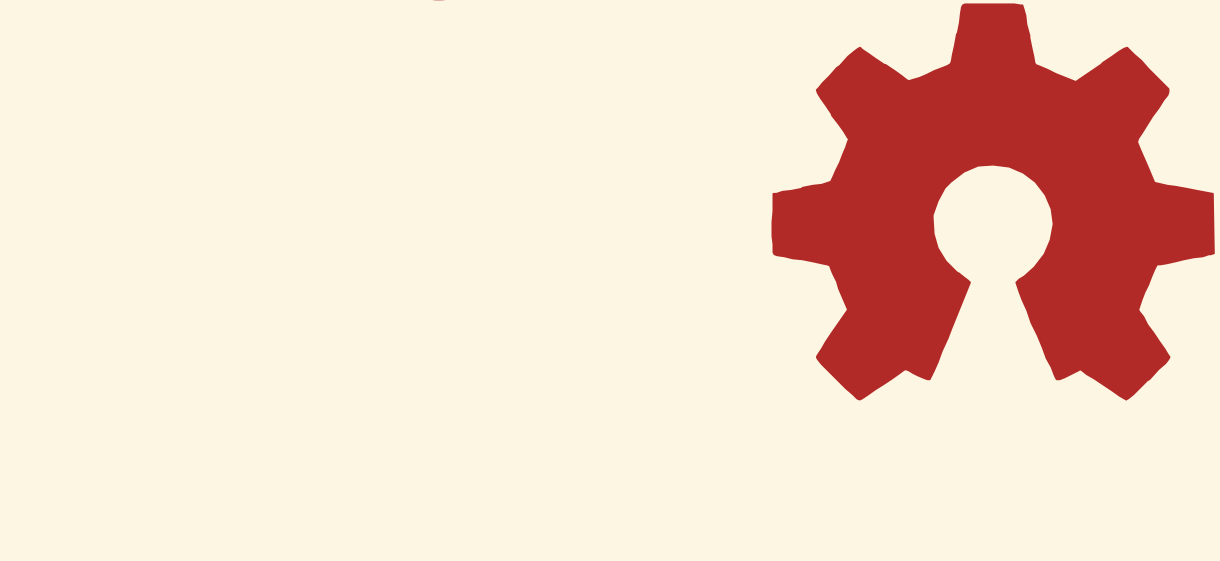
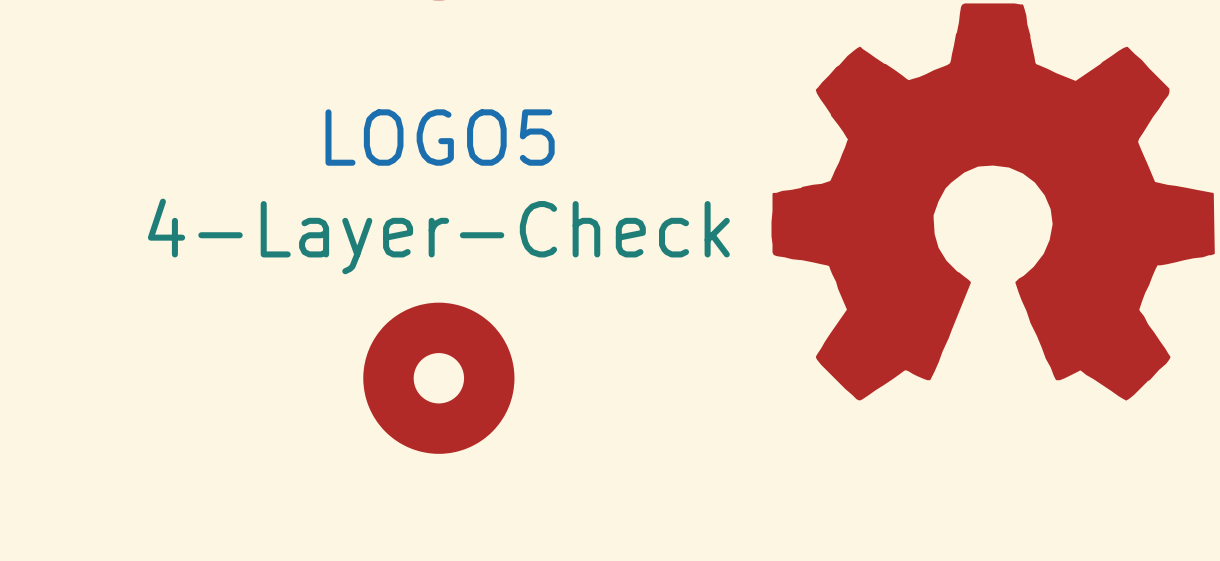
LOGO5: none -> 4-Layer-Check (438, 378)

